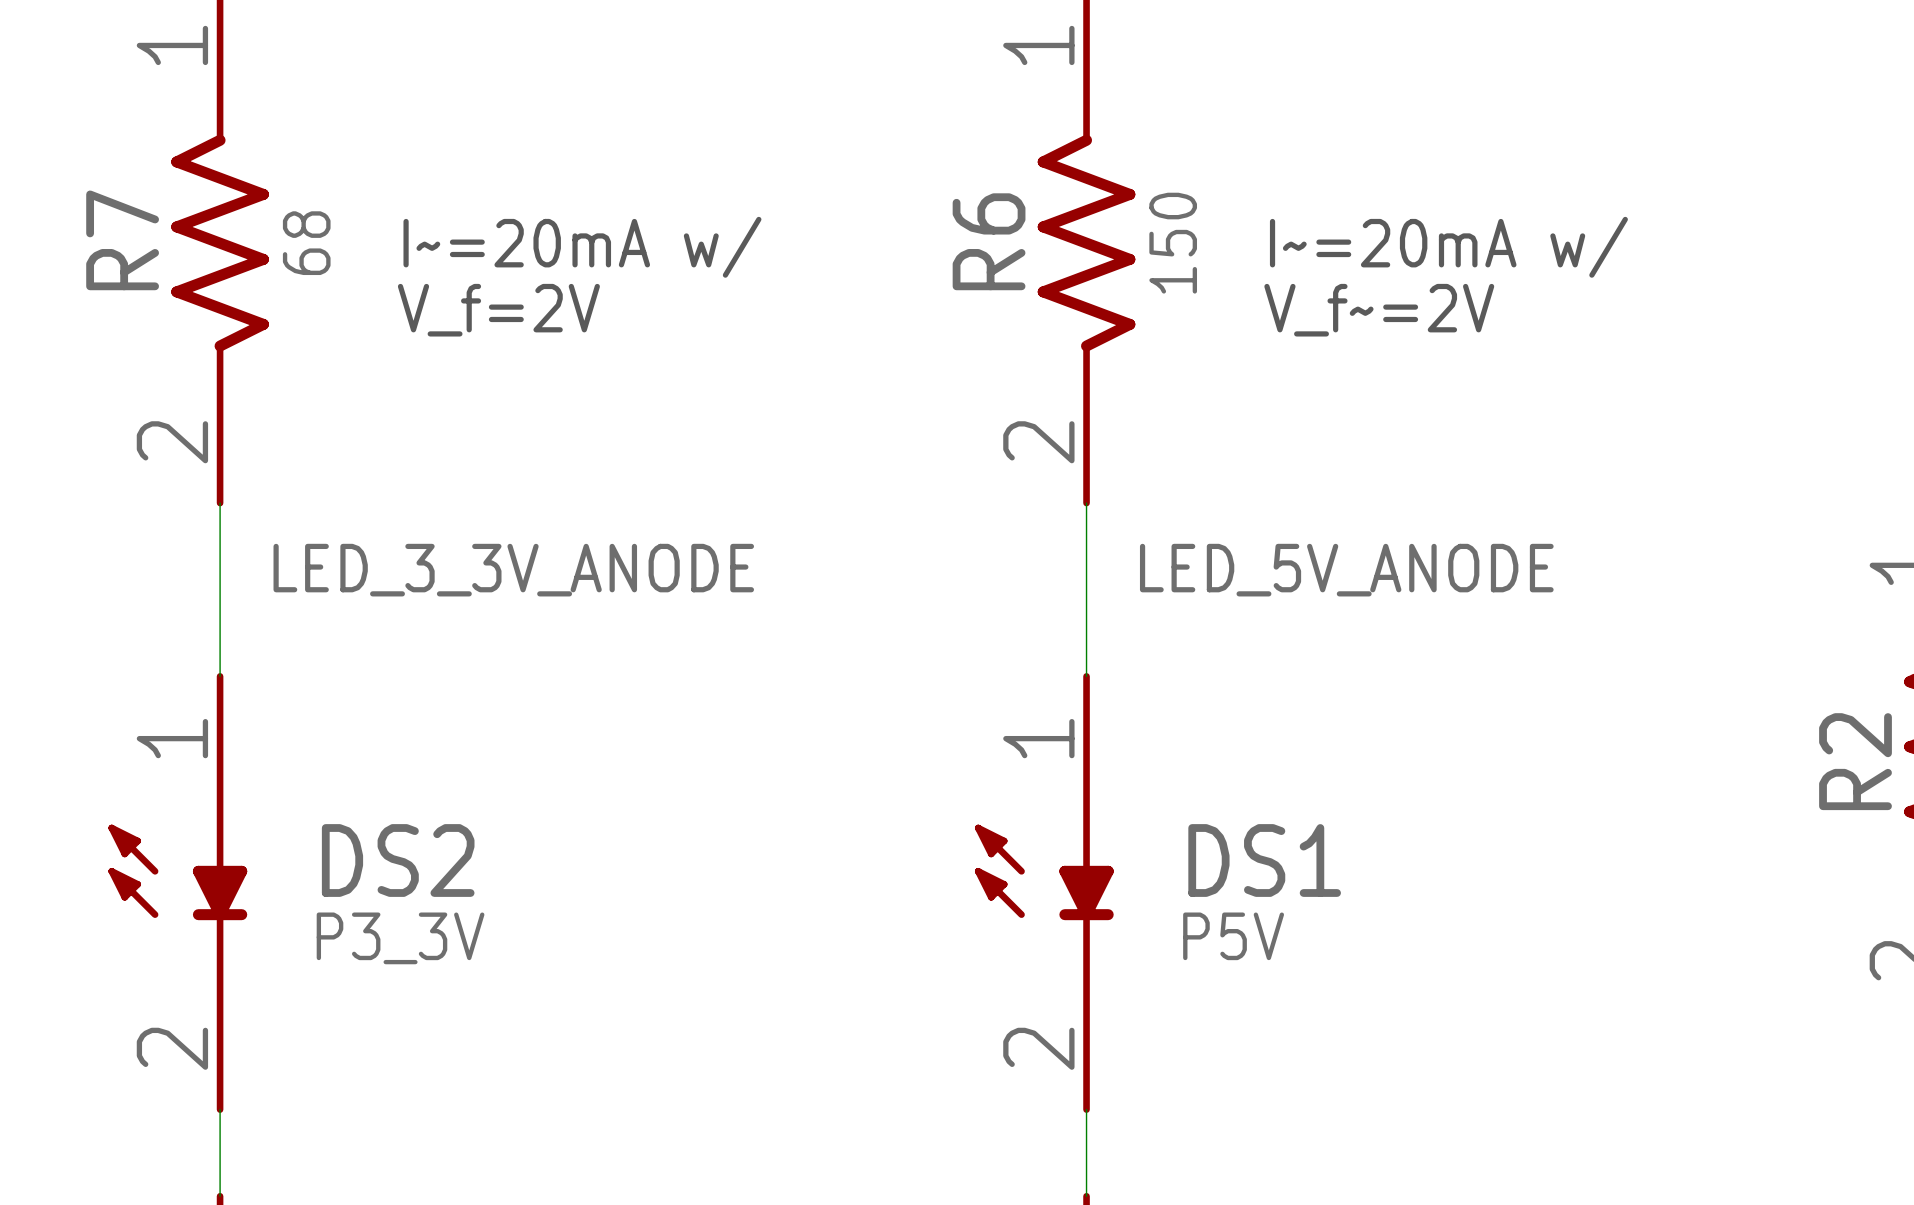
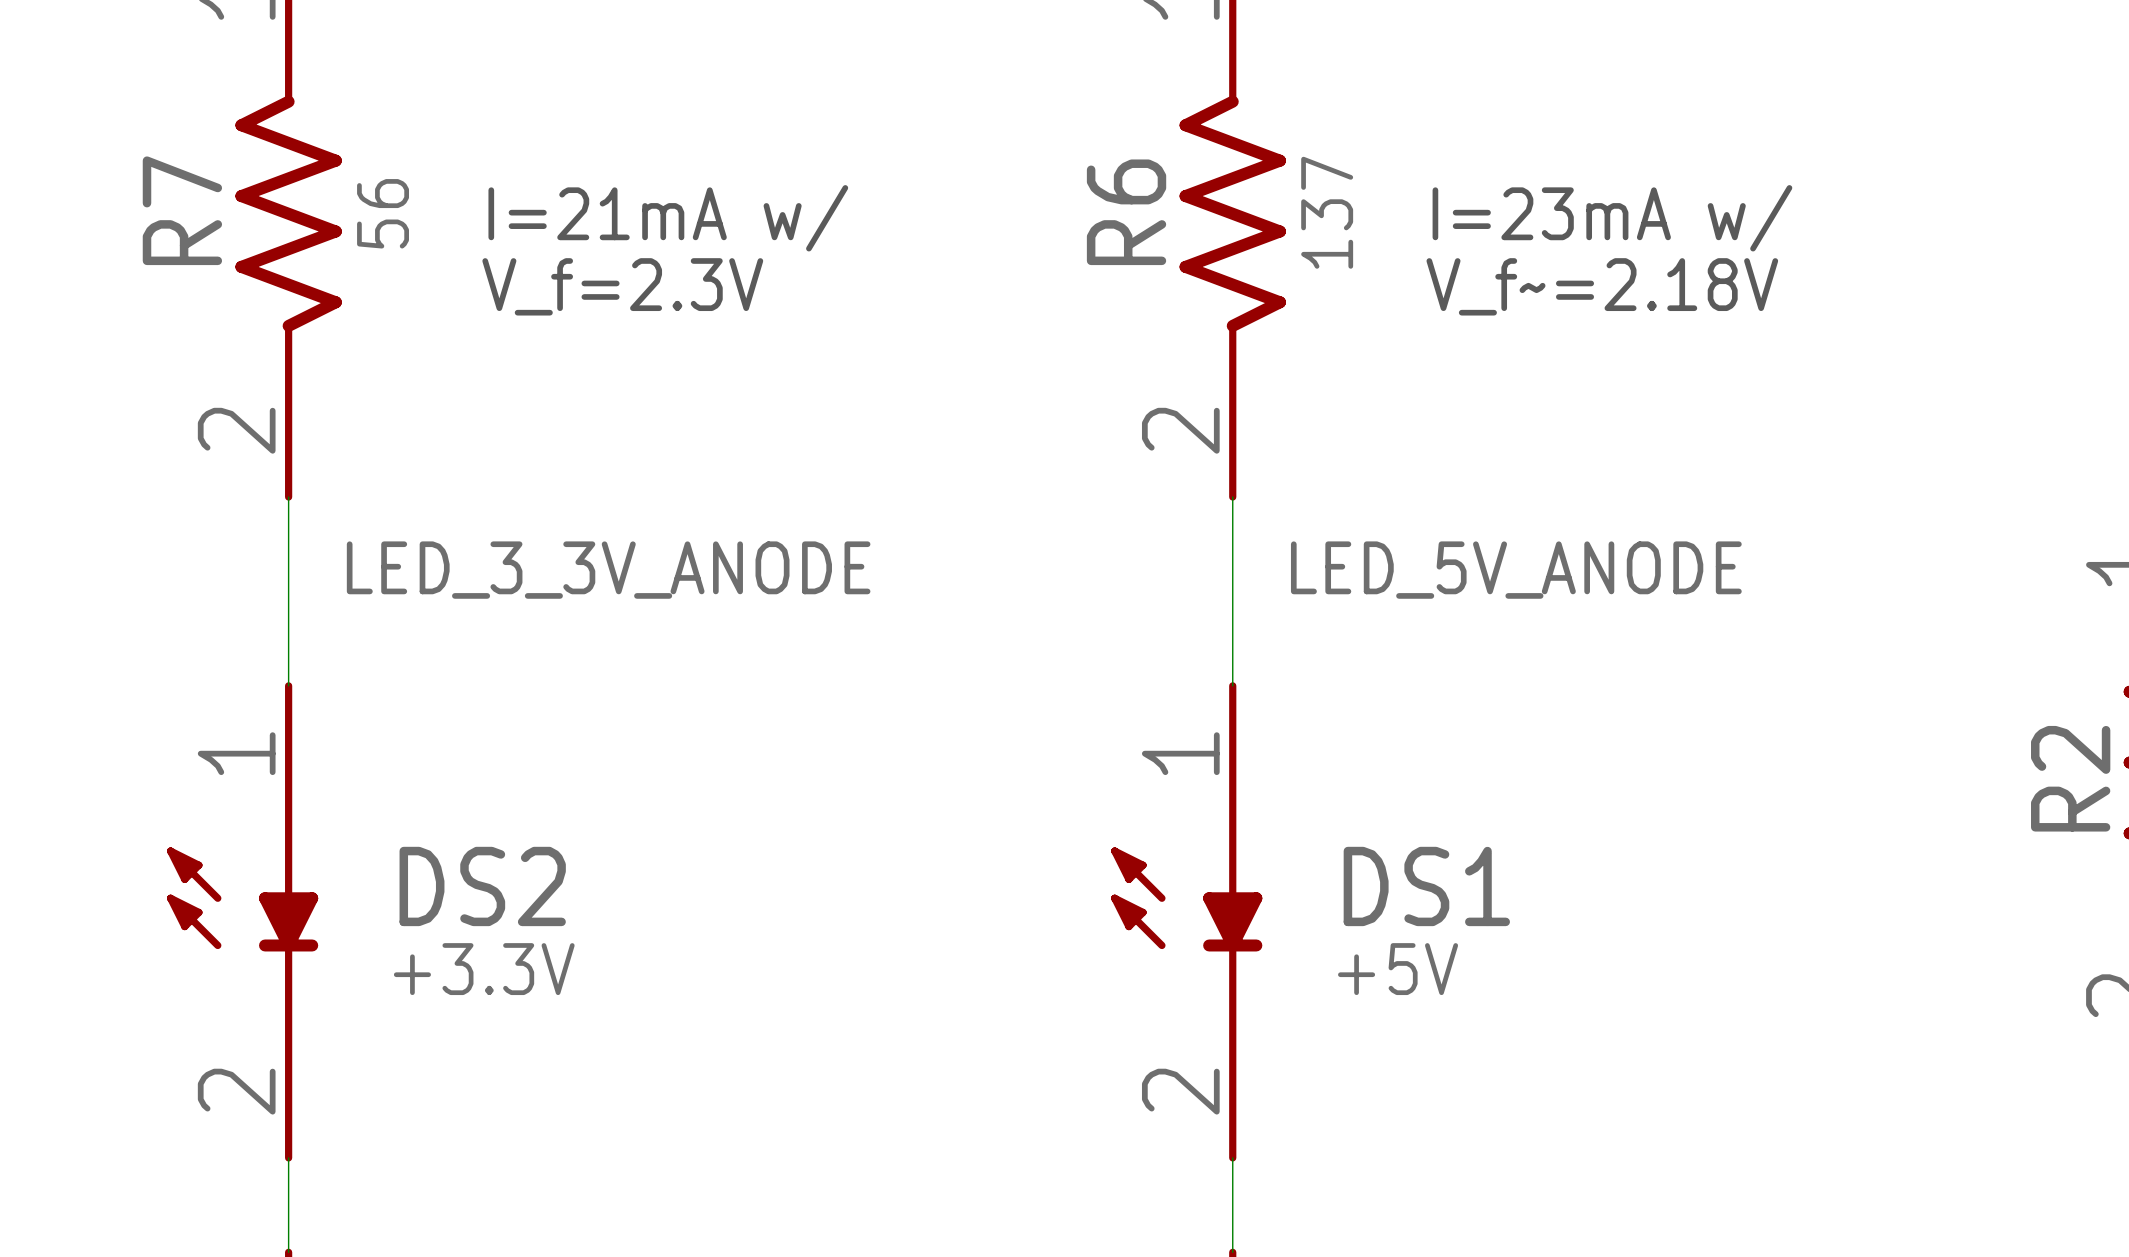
R7 value: 68 (306, 243) -> 56 (383, 213)
R6 value: 150 (1173, 243) -> 137 (1327, 212)
text: I~=20mA w/ (582, 247) -> I=21mA w/ (668, 218)
text: I~=20mA w/ (1448, 247) -> I=23mA w/ (1612, 218)
text: V_f=2V (498, 310) -> V_f=2.3V (622, 286)
text: V_f~=2V (1379, 310) -> V_f~=2.18V (1602, 286)
DS1 value: P5V (1233, 936) -> +5V (1398, 969)
DS2 value: P3_3V (400, 938) -> +3.3V (484, 969)

